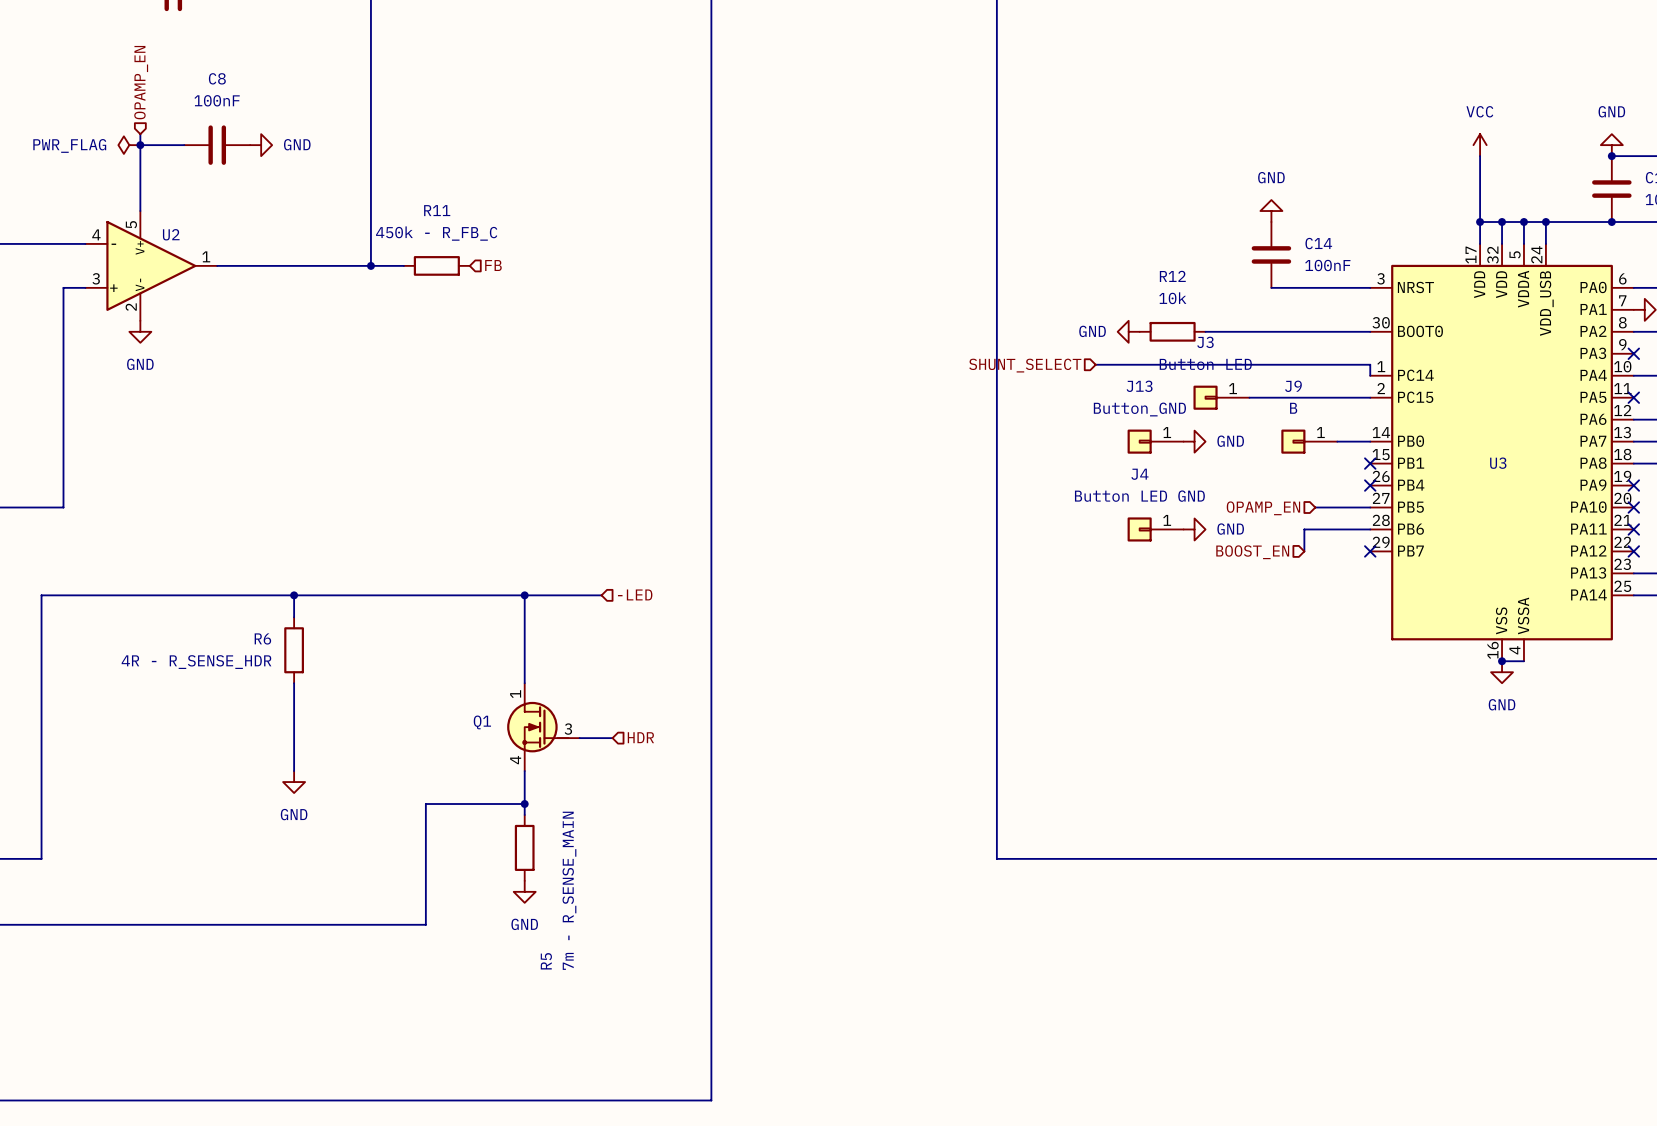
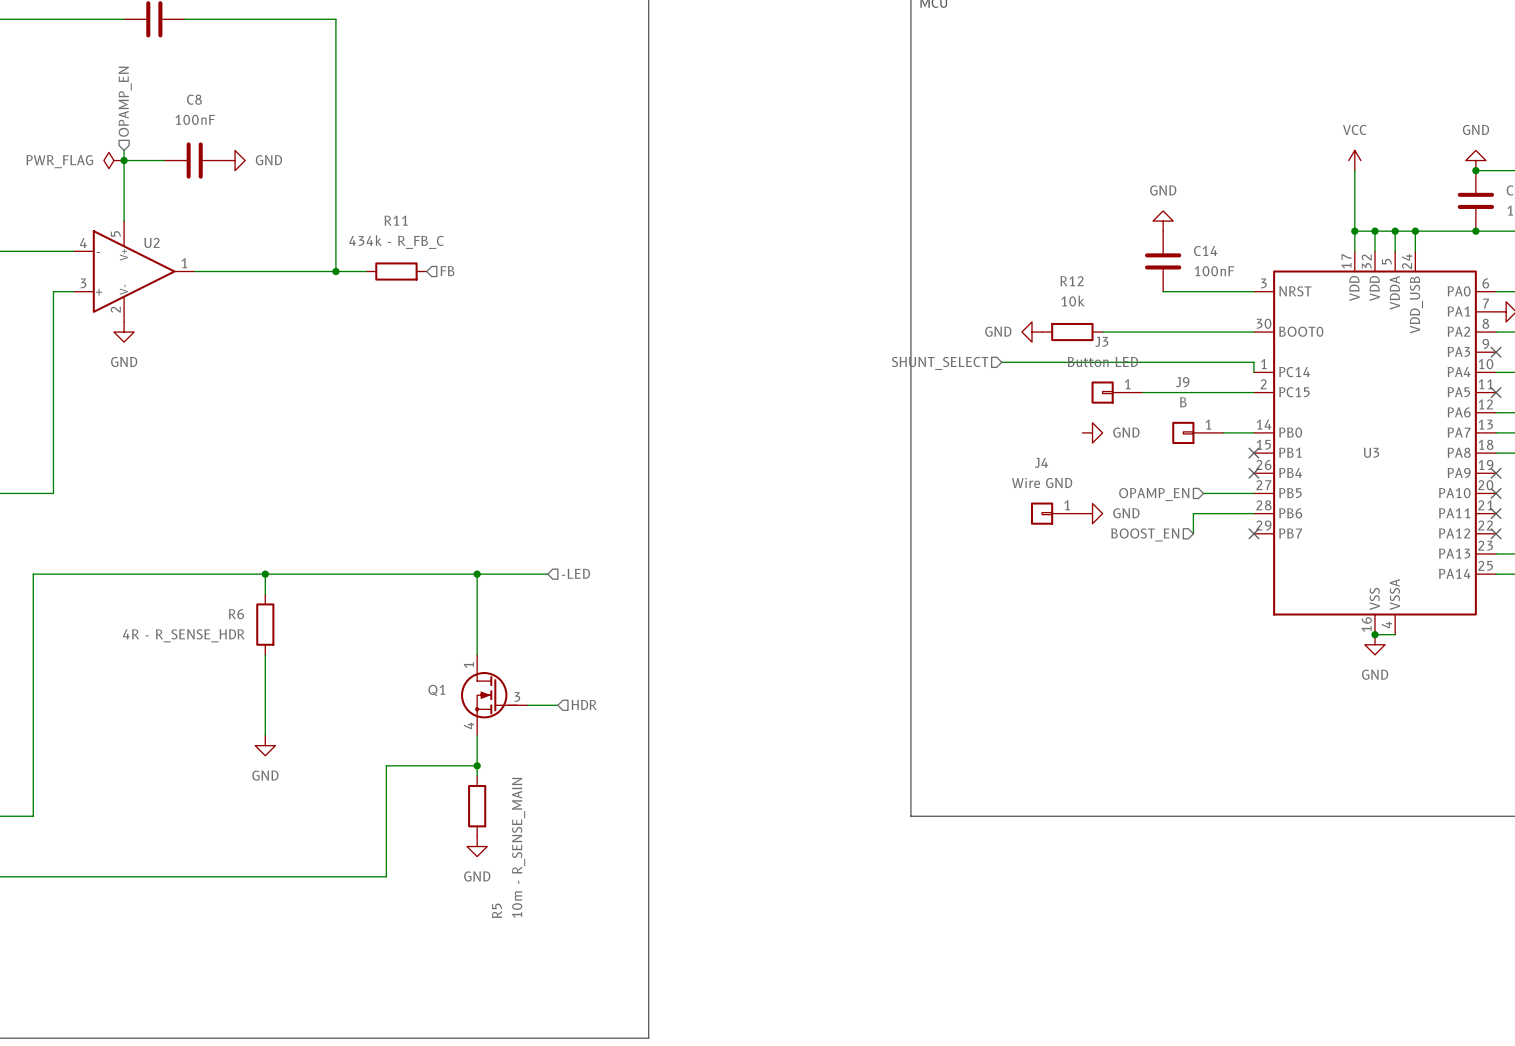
R11 value: 450k - R_FB_C (436, 233) -> 434k - R_FB_C (396, 242)
J13: Button_GND (1155, 441) -> none
J4 value: Button LED GND (1139, 496) -> Wire GND (1042, 483)
R5 value: 7m - R_SENSE_MAIN (569, 890) -> 10m - R_SENSE_MAIN (518, 847)

